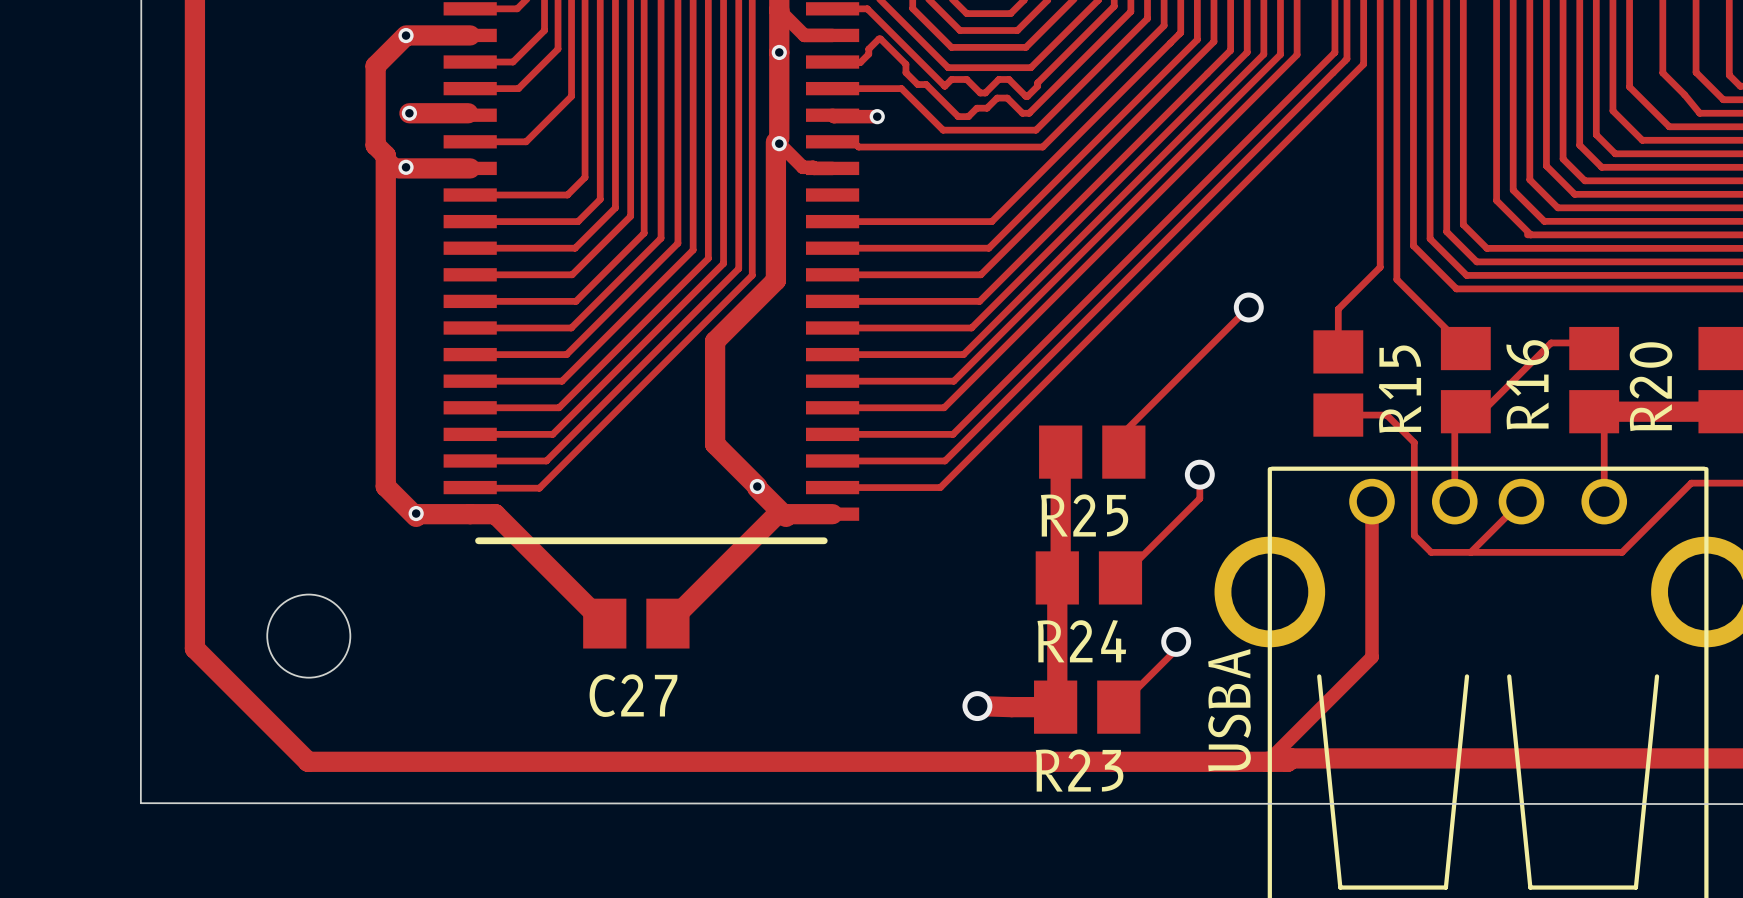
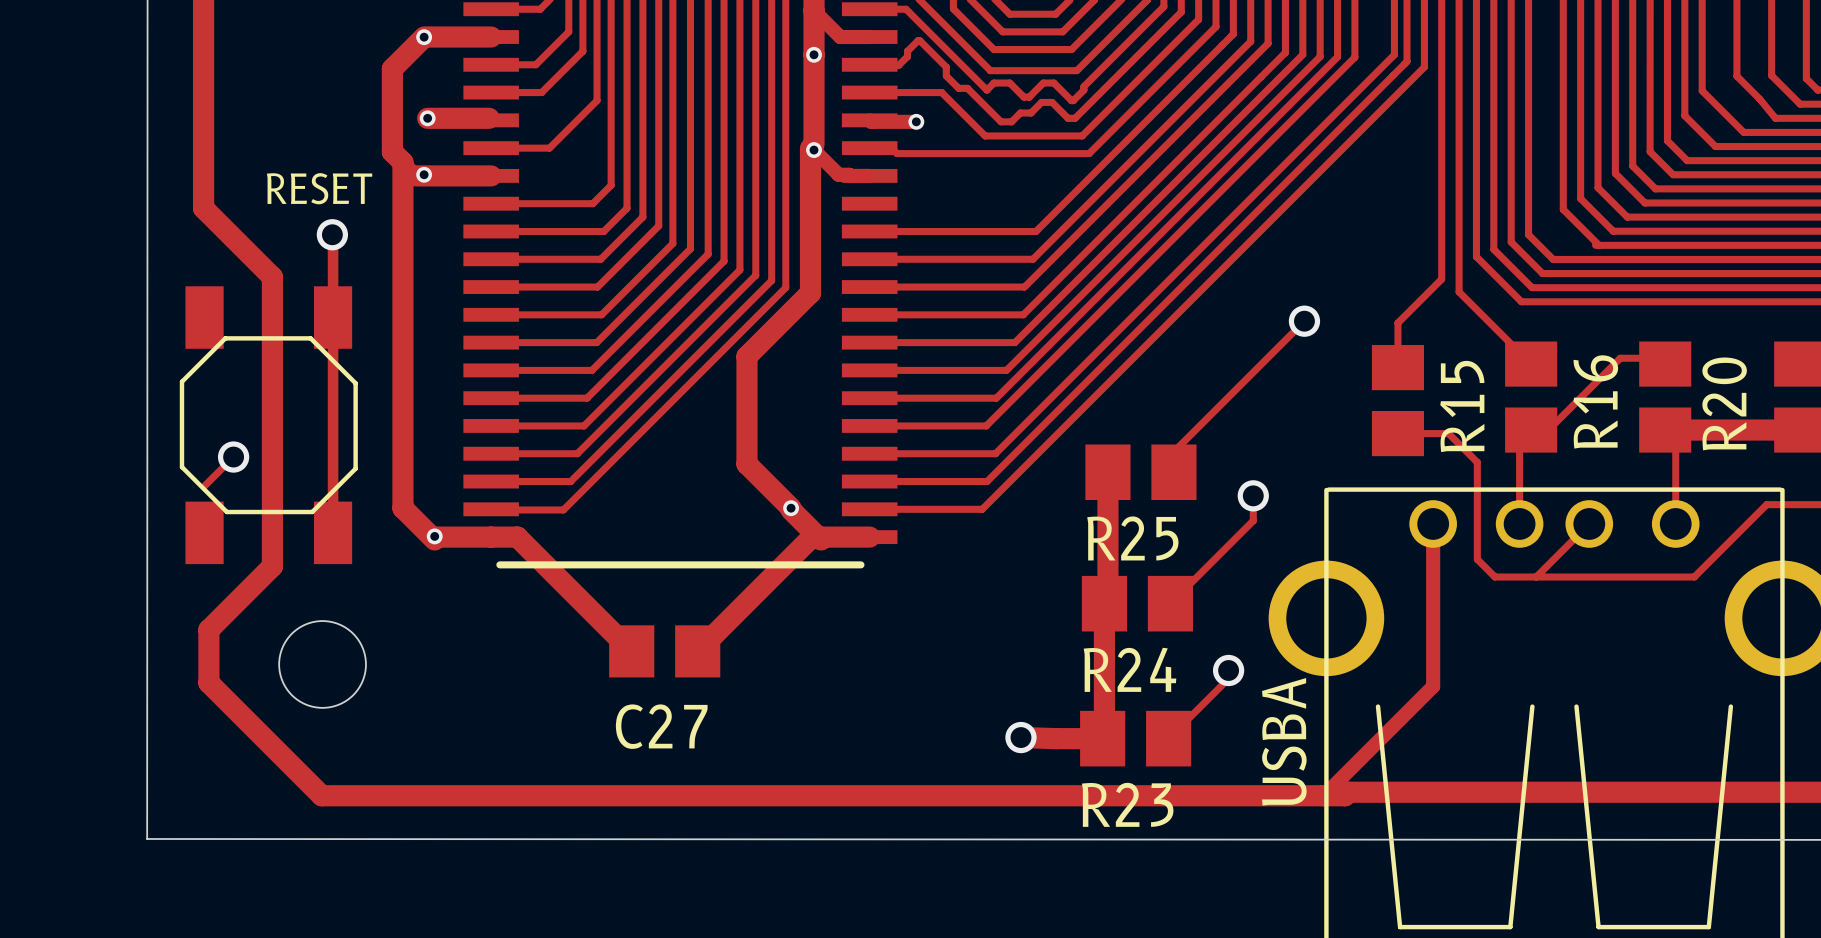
track: (194, 199) (194, 648) (199, 653) -> (203, 208) (272, 277) (272, 566) (208, 629) (208, 682)
track: none -> (332, 234) (333, 532)
via: none -> (332, 234)
RESET: none -> (268, 425)
track: none -> (233, 457) (204, 486)
via: none -> (233, 457)

